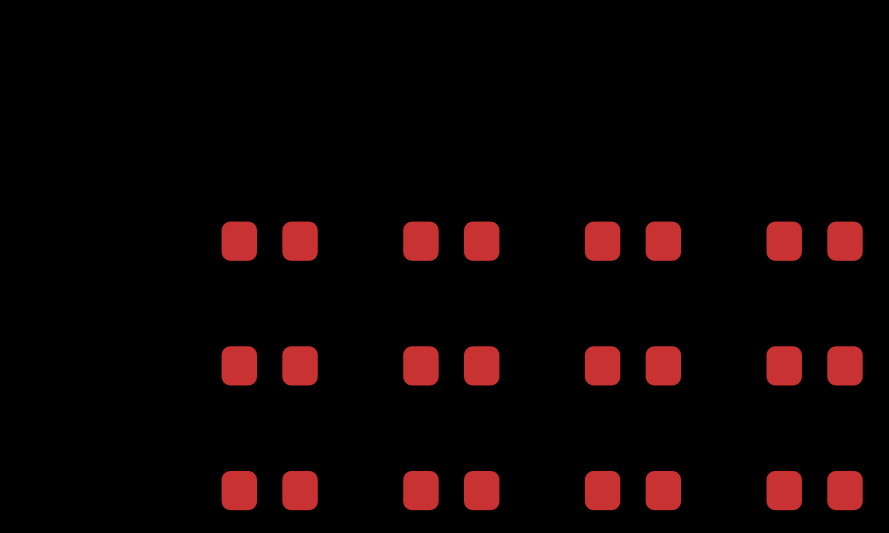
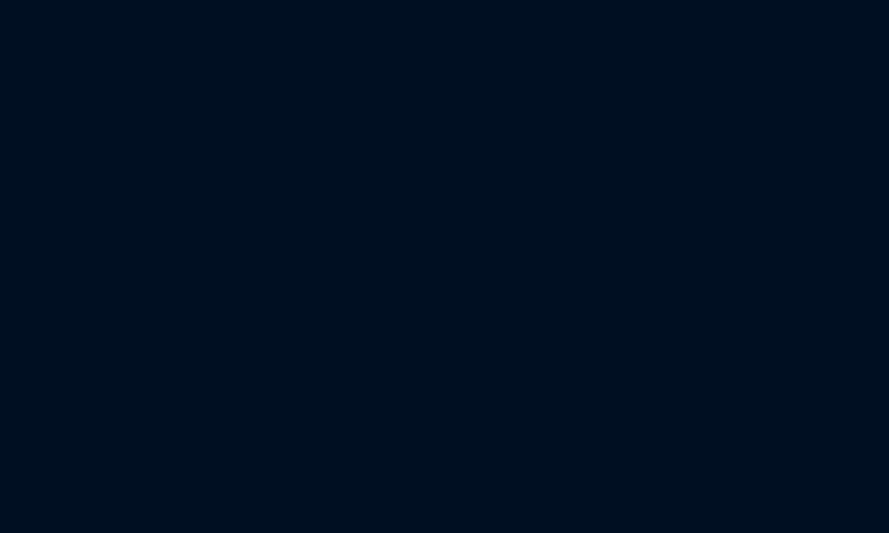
part: (269, 241) -> none
part: (451, 241) -> none
part: (632, 241) -> none
part: (814, 241) -> none
part: (269, 365) -> none
part: (451, 365) -> none
part: (632, 365) -> none
part: (814, 365) -> none
part: (269, 490) -> none
part: (451, 490) -> none
part: (632, 490) -> none
part: (814, 490) -> none

